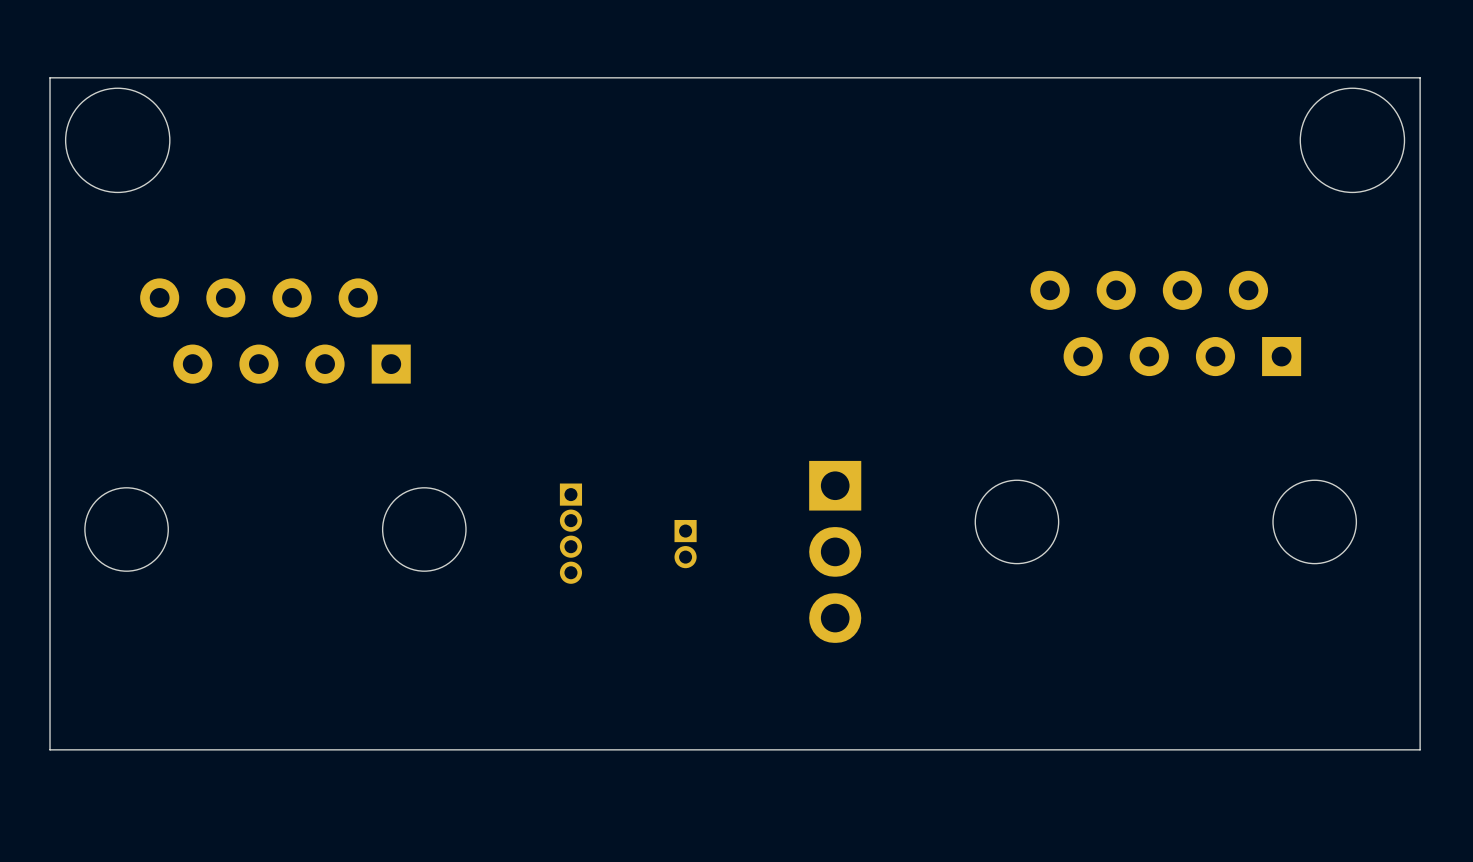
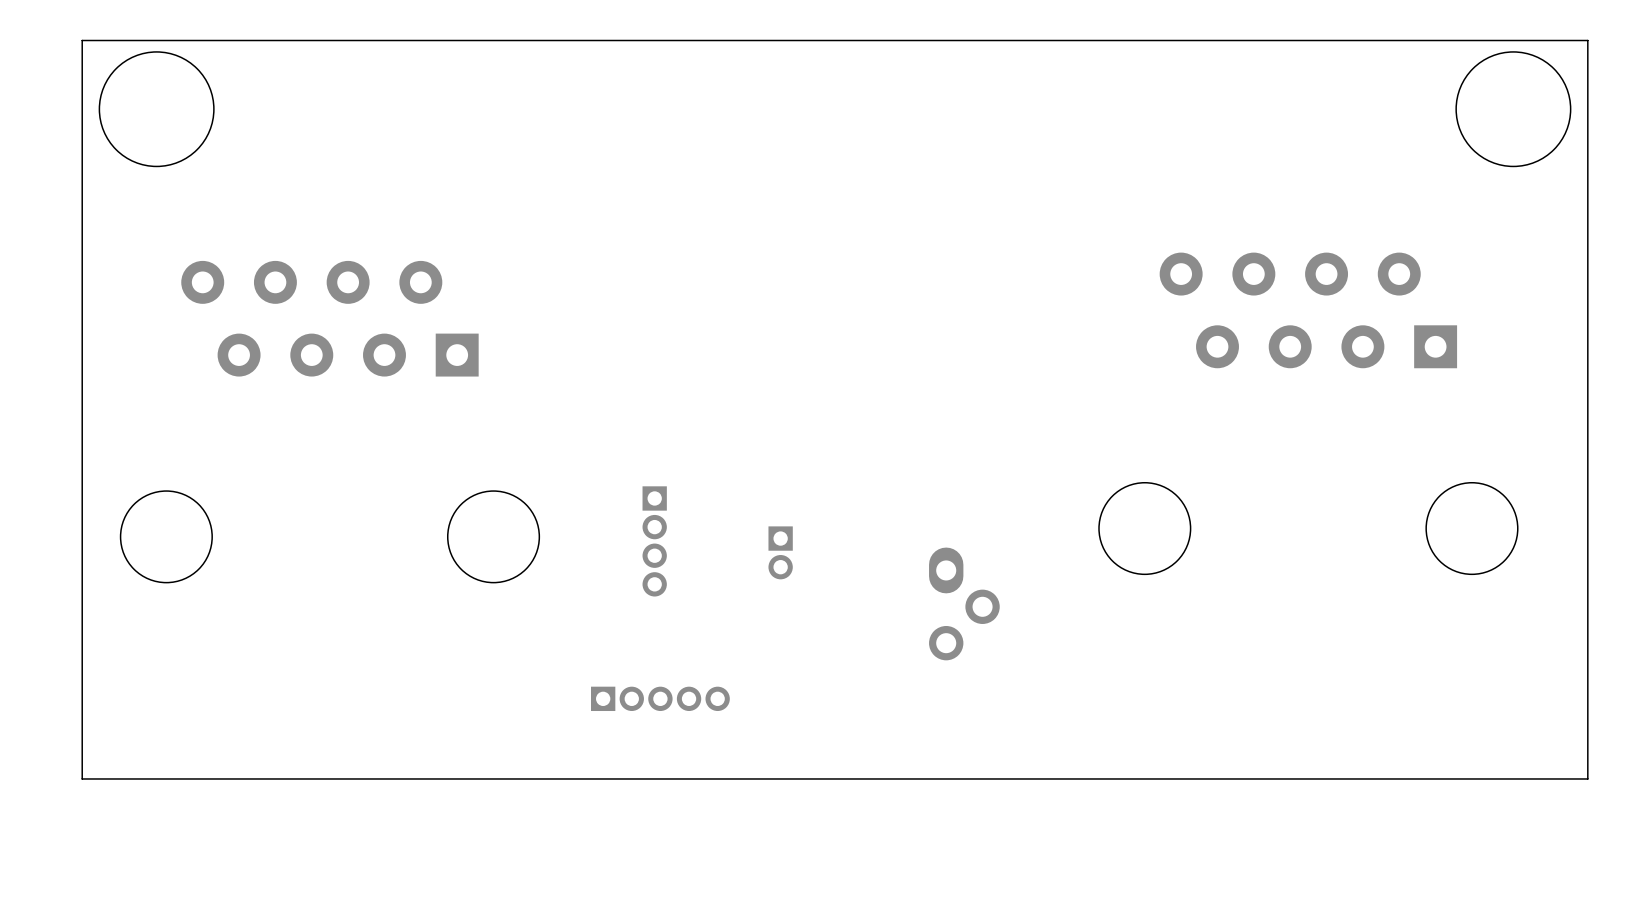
part: (835, 551) -> none
part: none -> (964, 603)
part: none -> (660, 698)

